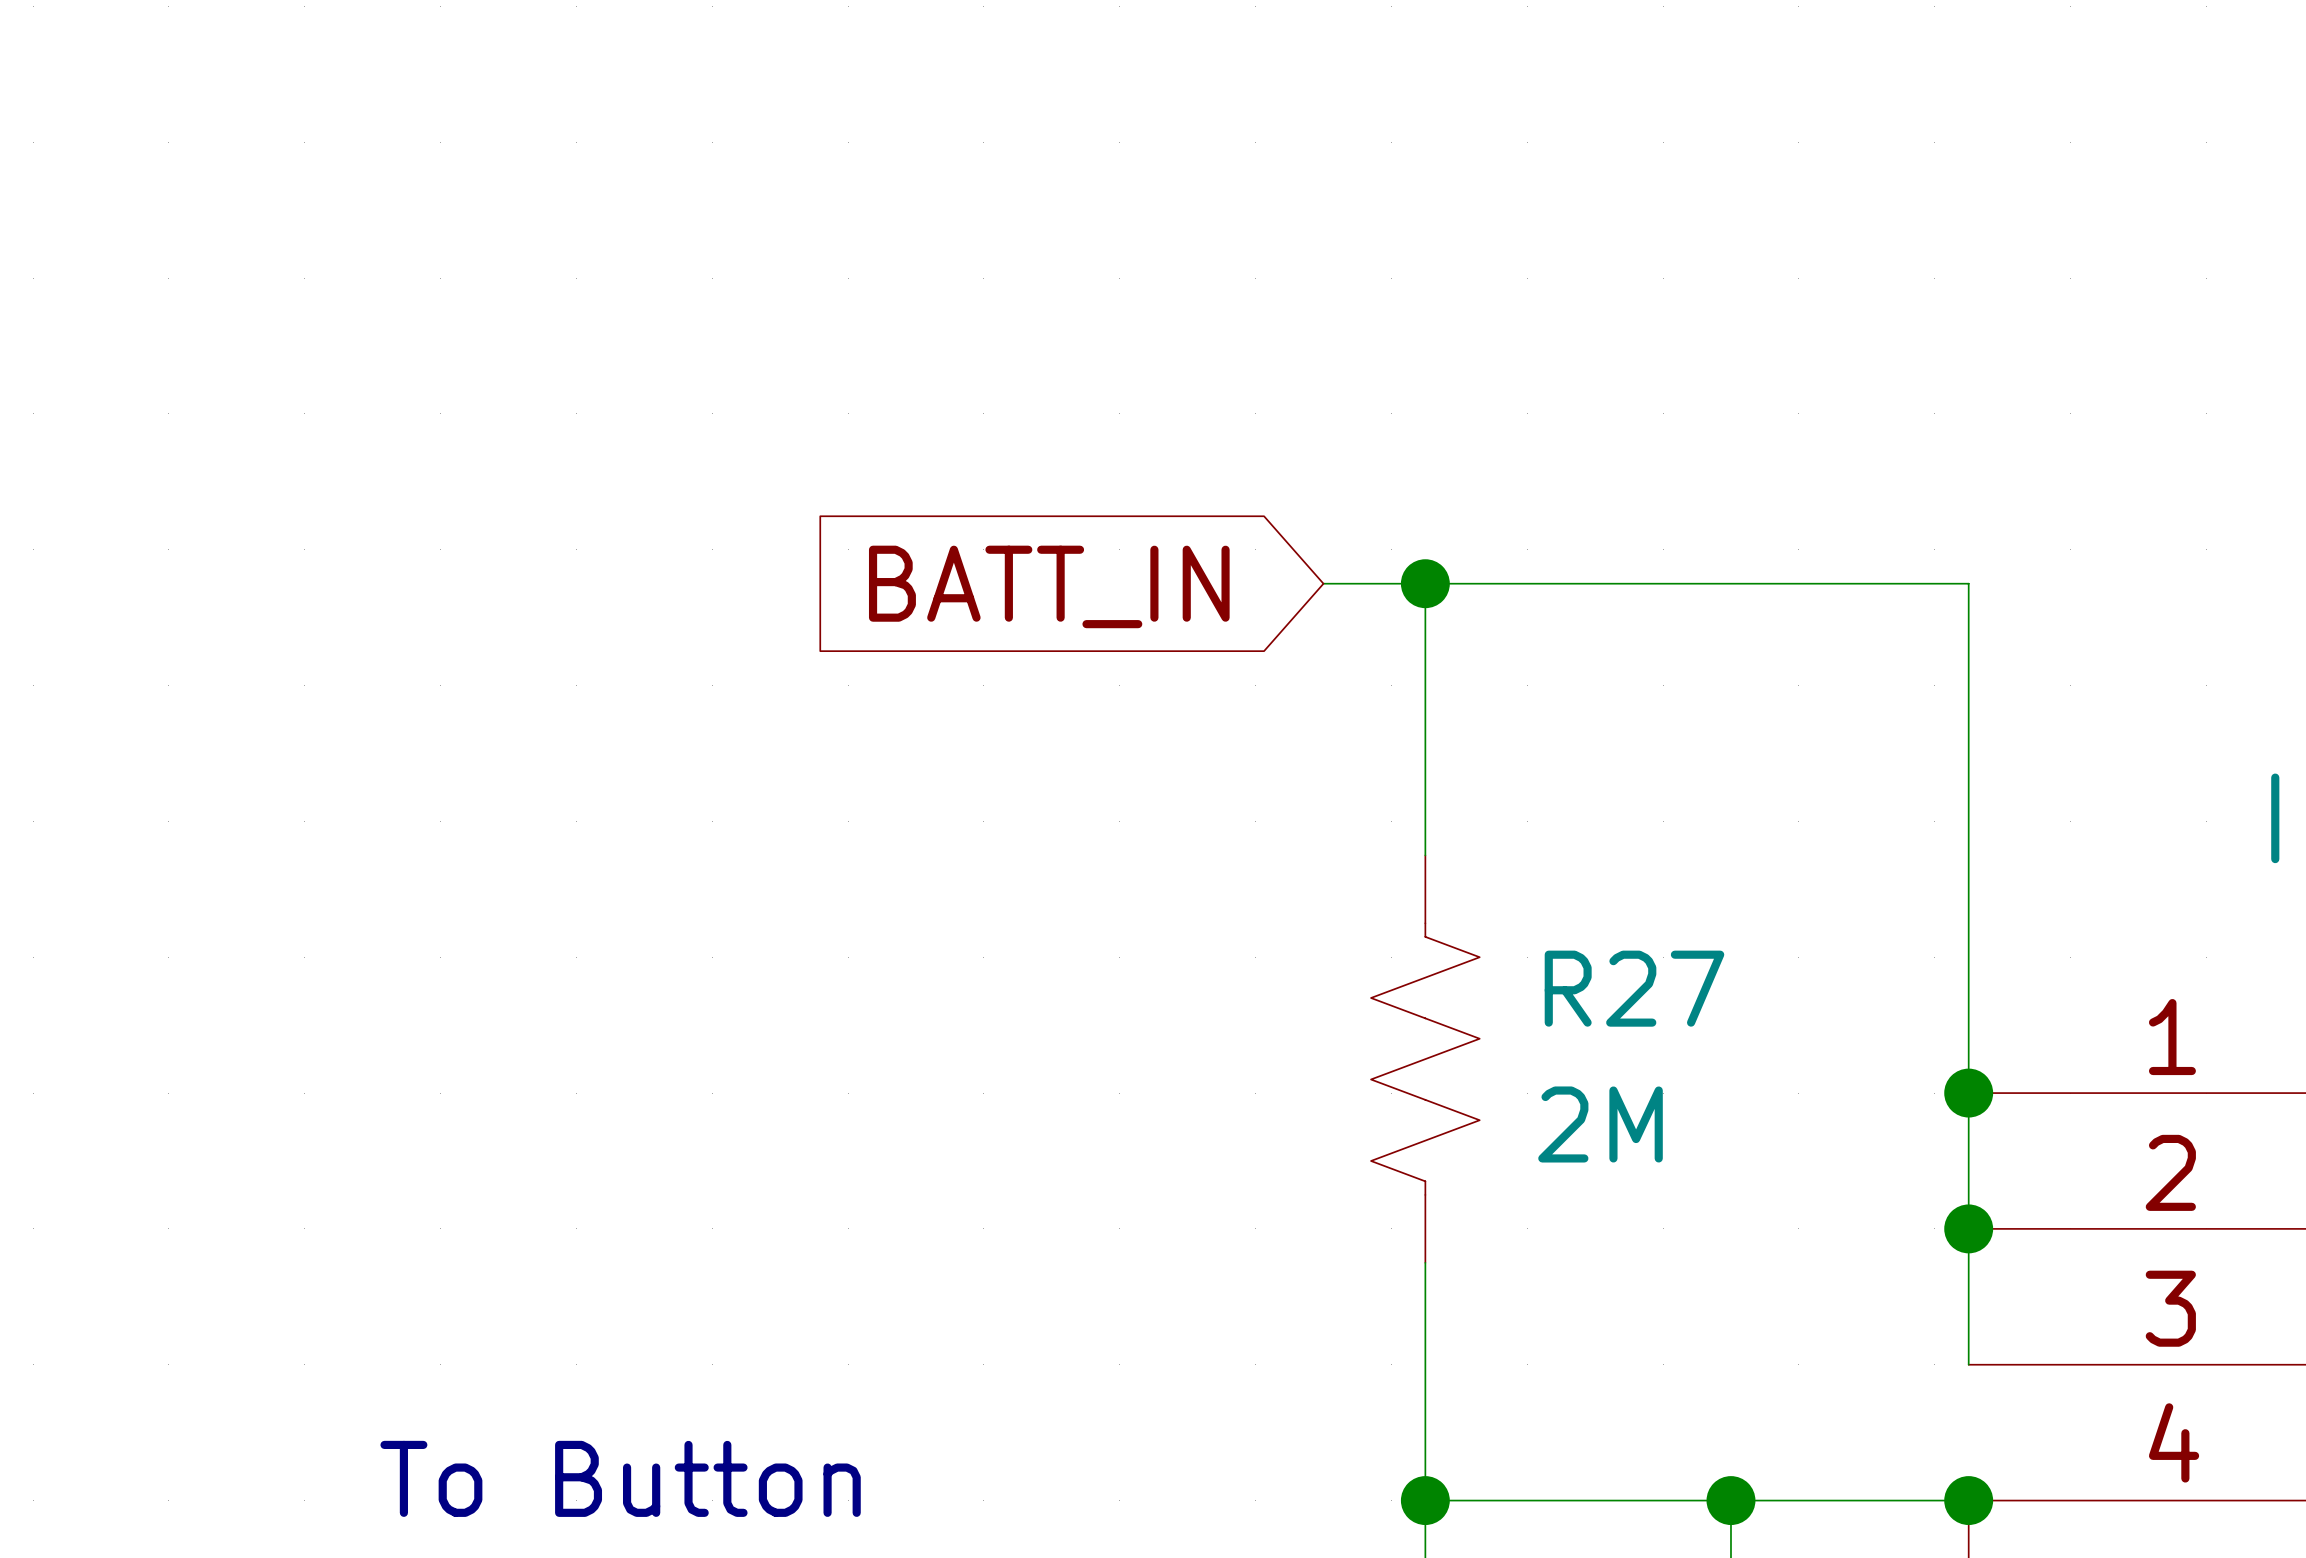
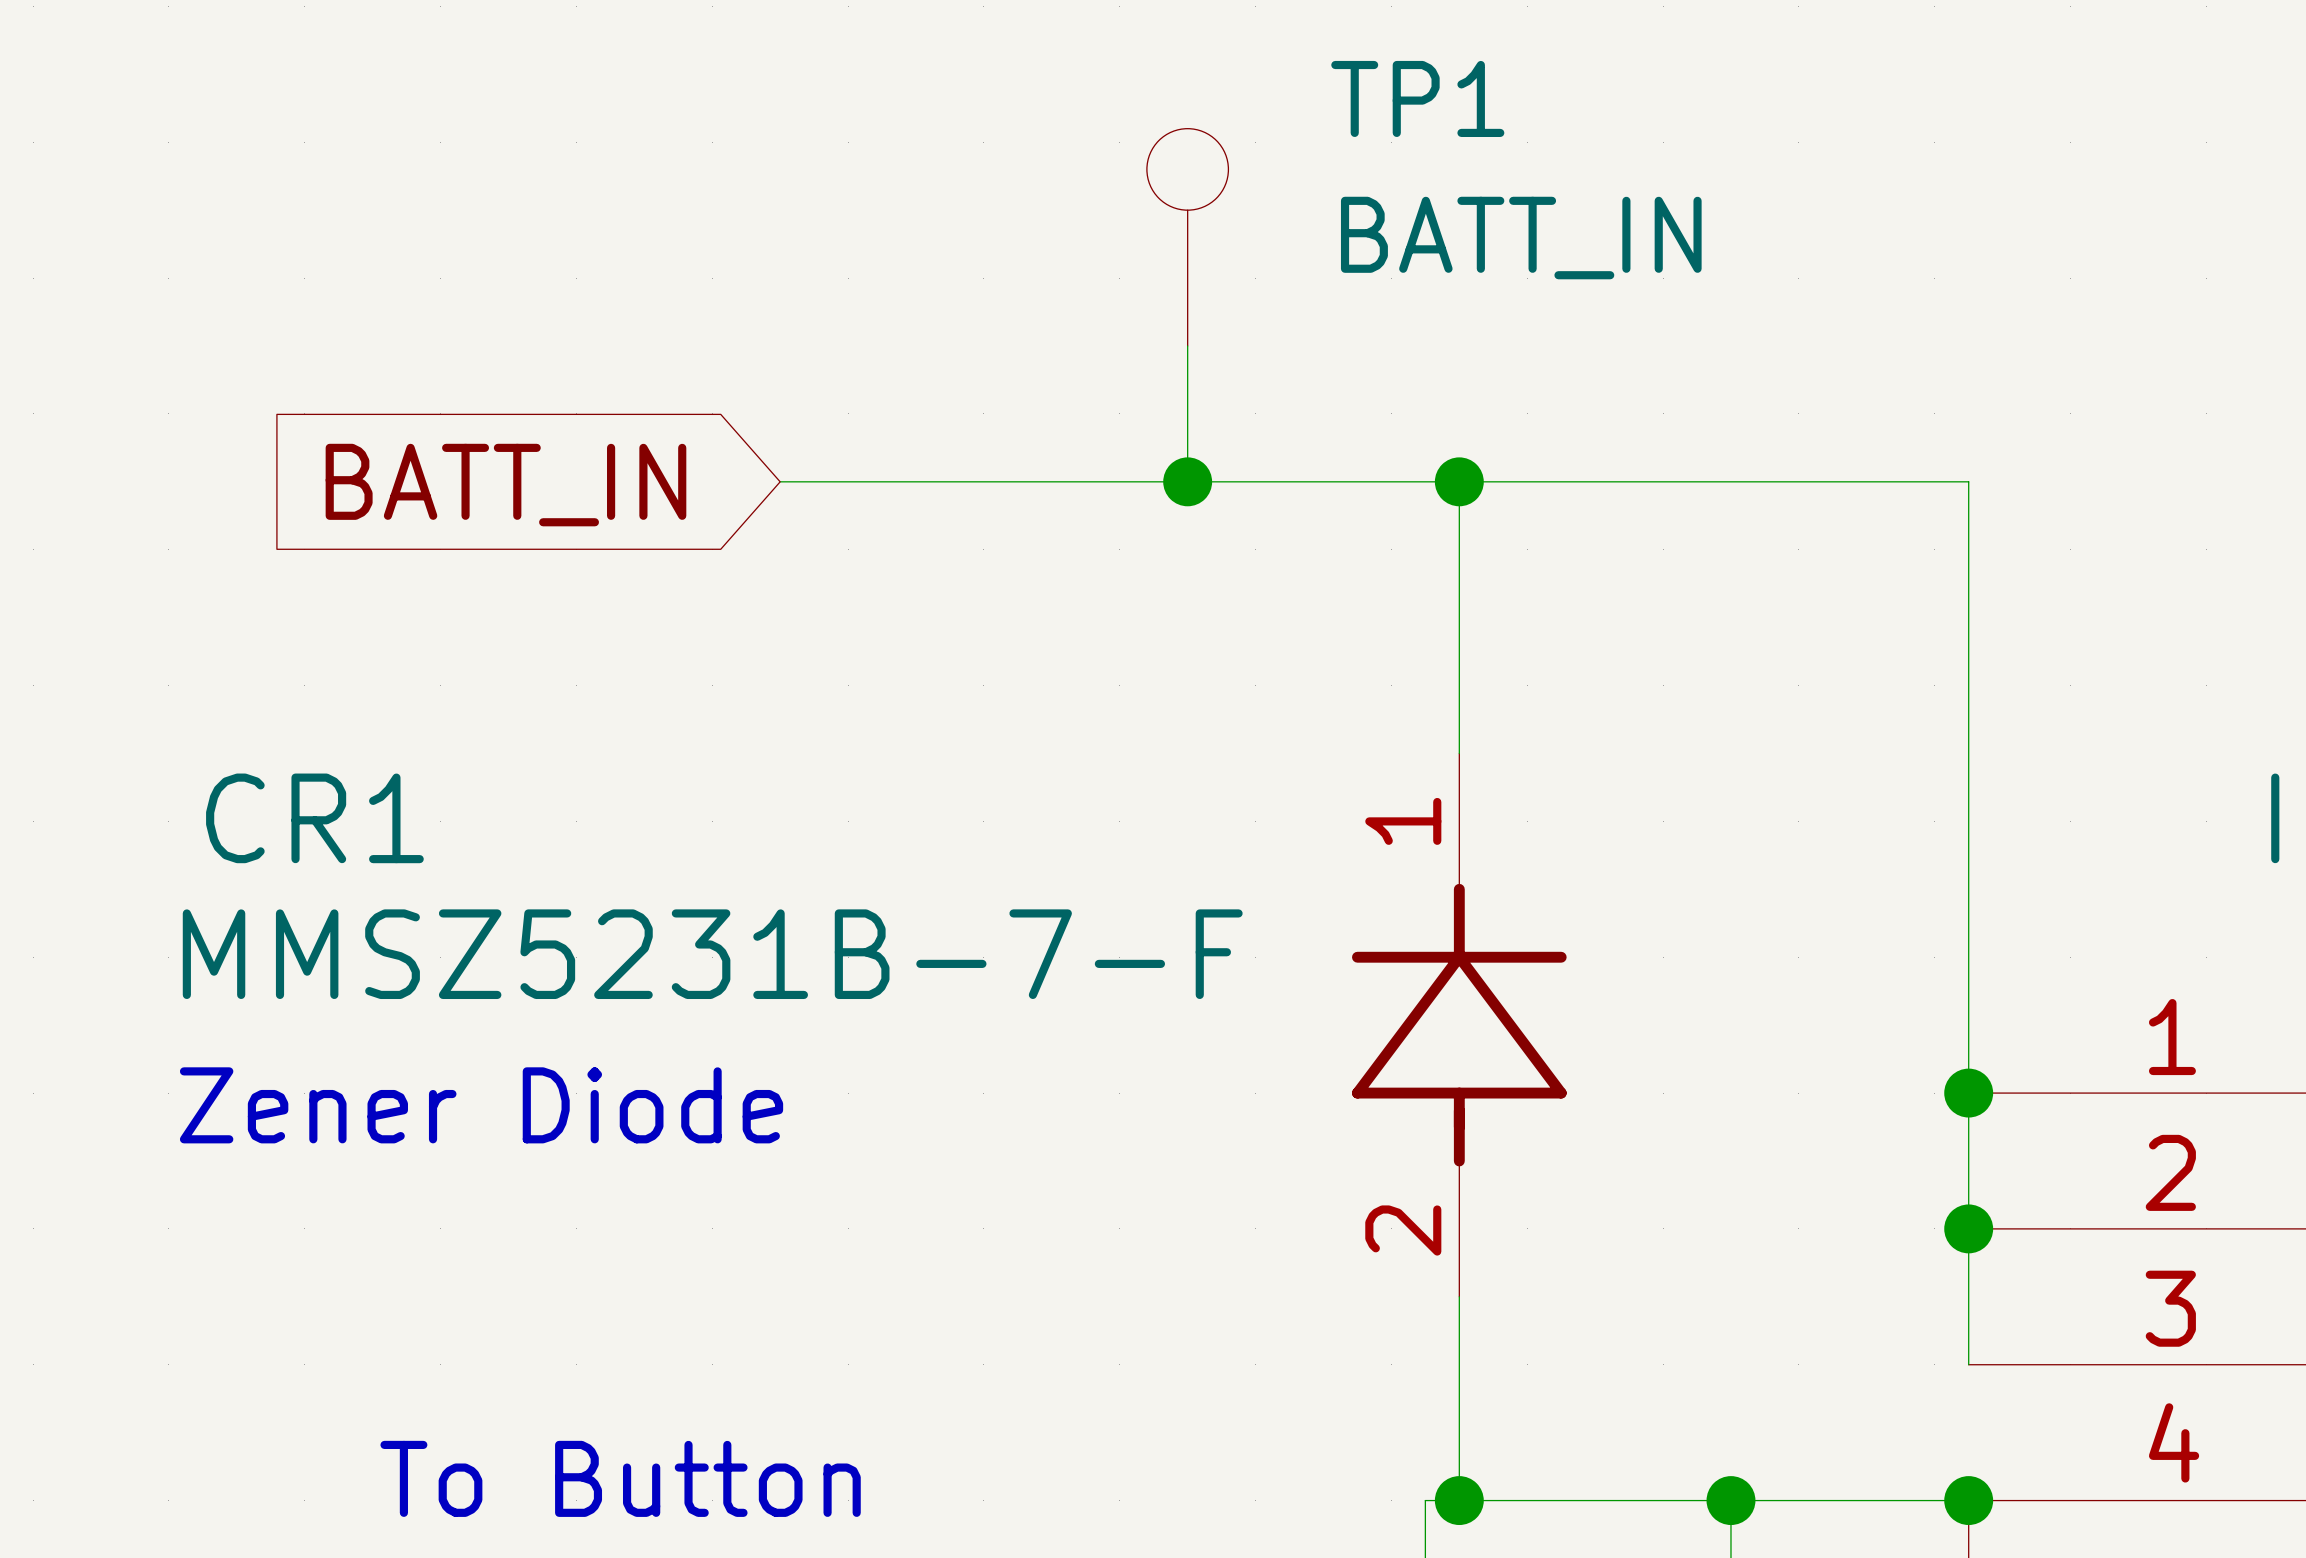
TP1: none -> BATT_IN (1187, 237)
wire: none -> (1187, 346) (1187, 481)
junction: none -> (1187, 481)
wire: (1323, 583) (1968, 583) -> (780, 481) (1968, 481) (1968, 583)
wire: (1425, 583) (1425, 855) -> (1459, 481) (1459, 753)
junction position: (1425, 583) -> (1459, 481)
global label position: BATT_IN (1049, 586) -> BATT_IN (505, 485)
CR1: none -> MMSZ5231B-7-F (1459, 1025)
R27: 2M (1425, 1059) -> none
text: none -> Zener Diode (481, 1105)
wire: (1425, 1262) (1425, 1500) -> none
wire: none -> (1459, 1296) (1459, 1500)
junction position: (1425, 1500) -> (1459, 1500)

